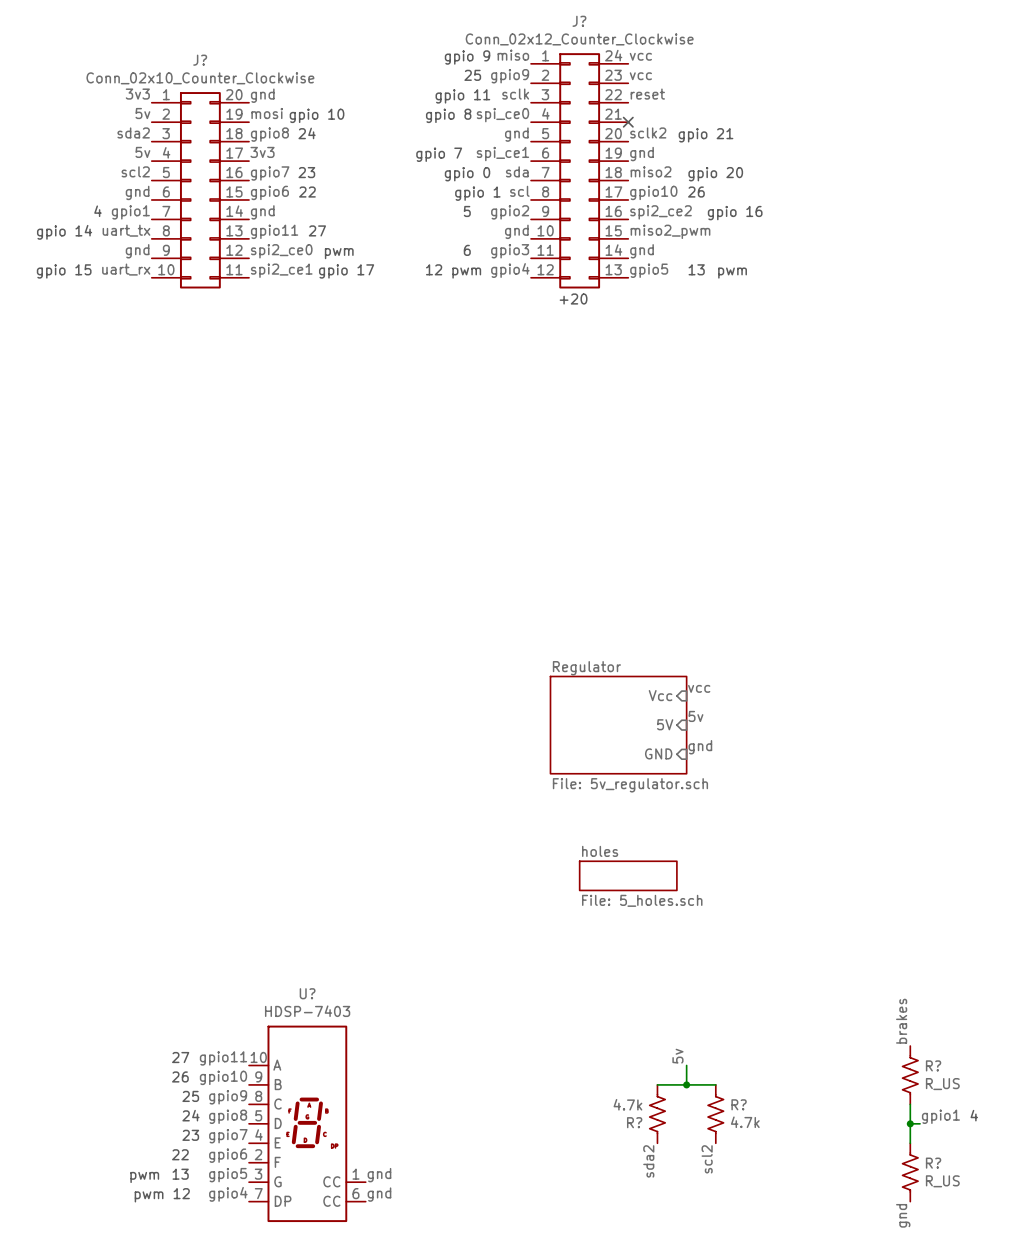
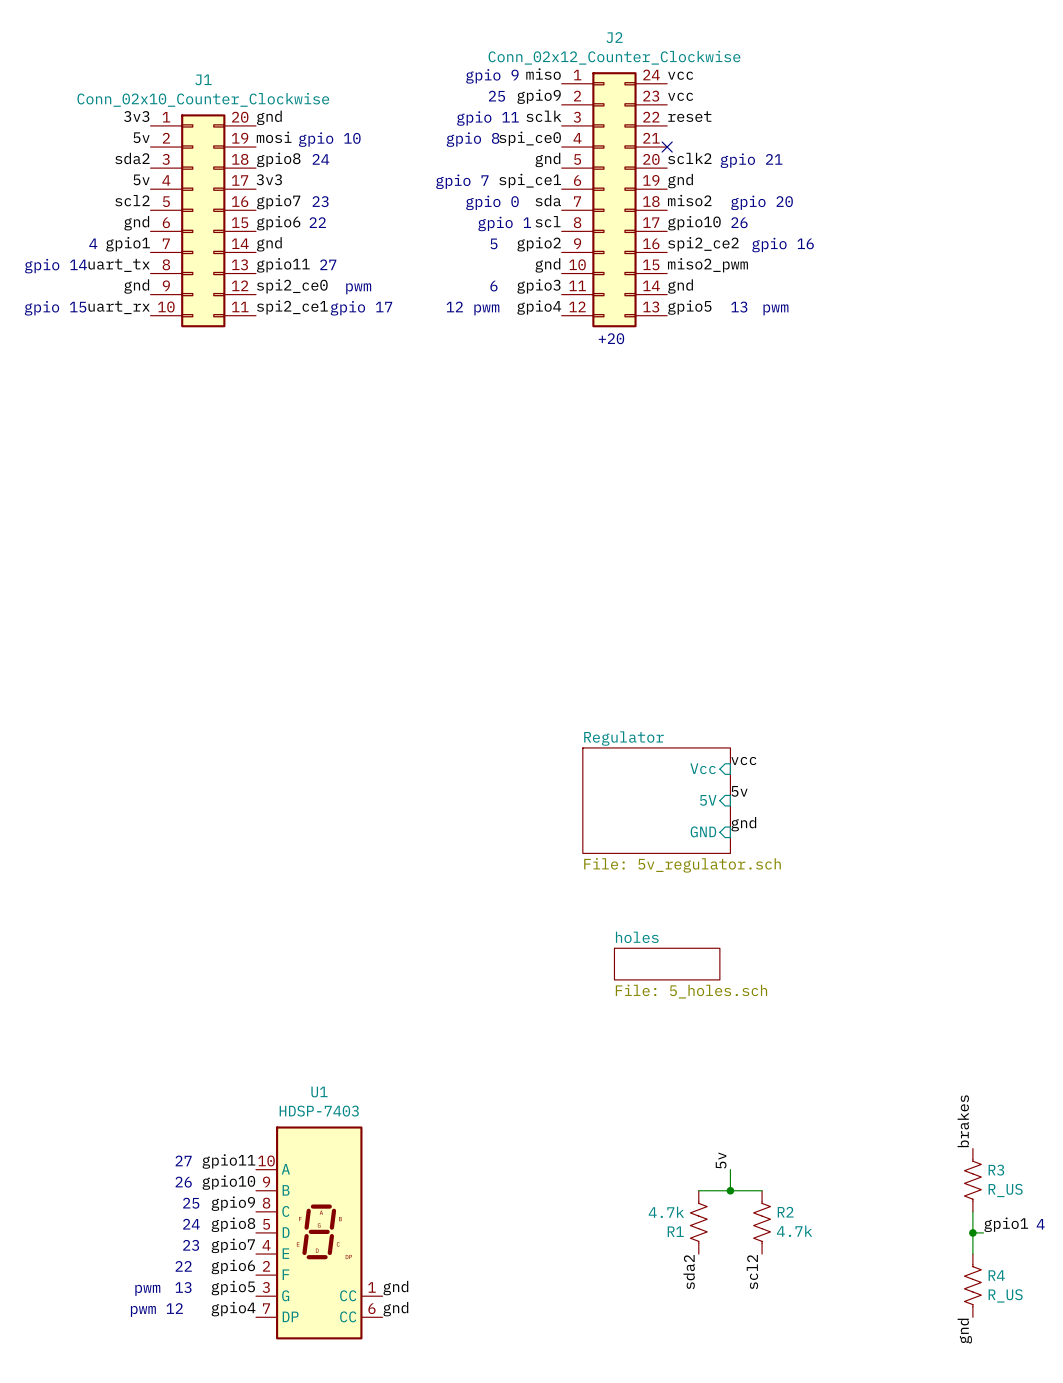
J? name: J? (579, 21) -> J2 (614, 37)
J? name: J? (200, 60) -> J1 (203, 79)
U? name: U? (307, 993) -> U1 (319, 1091)
R? name: R? (933, 1065) -> R3 (996, 1170)
R? name: R? (739, 1104) -> R2 (785, 1212)
R? name: R? (634, 1122) -> R1 (675, 1231)
R? name: R? (933, 1163) -> R4 (996, 1275)

